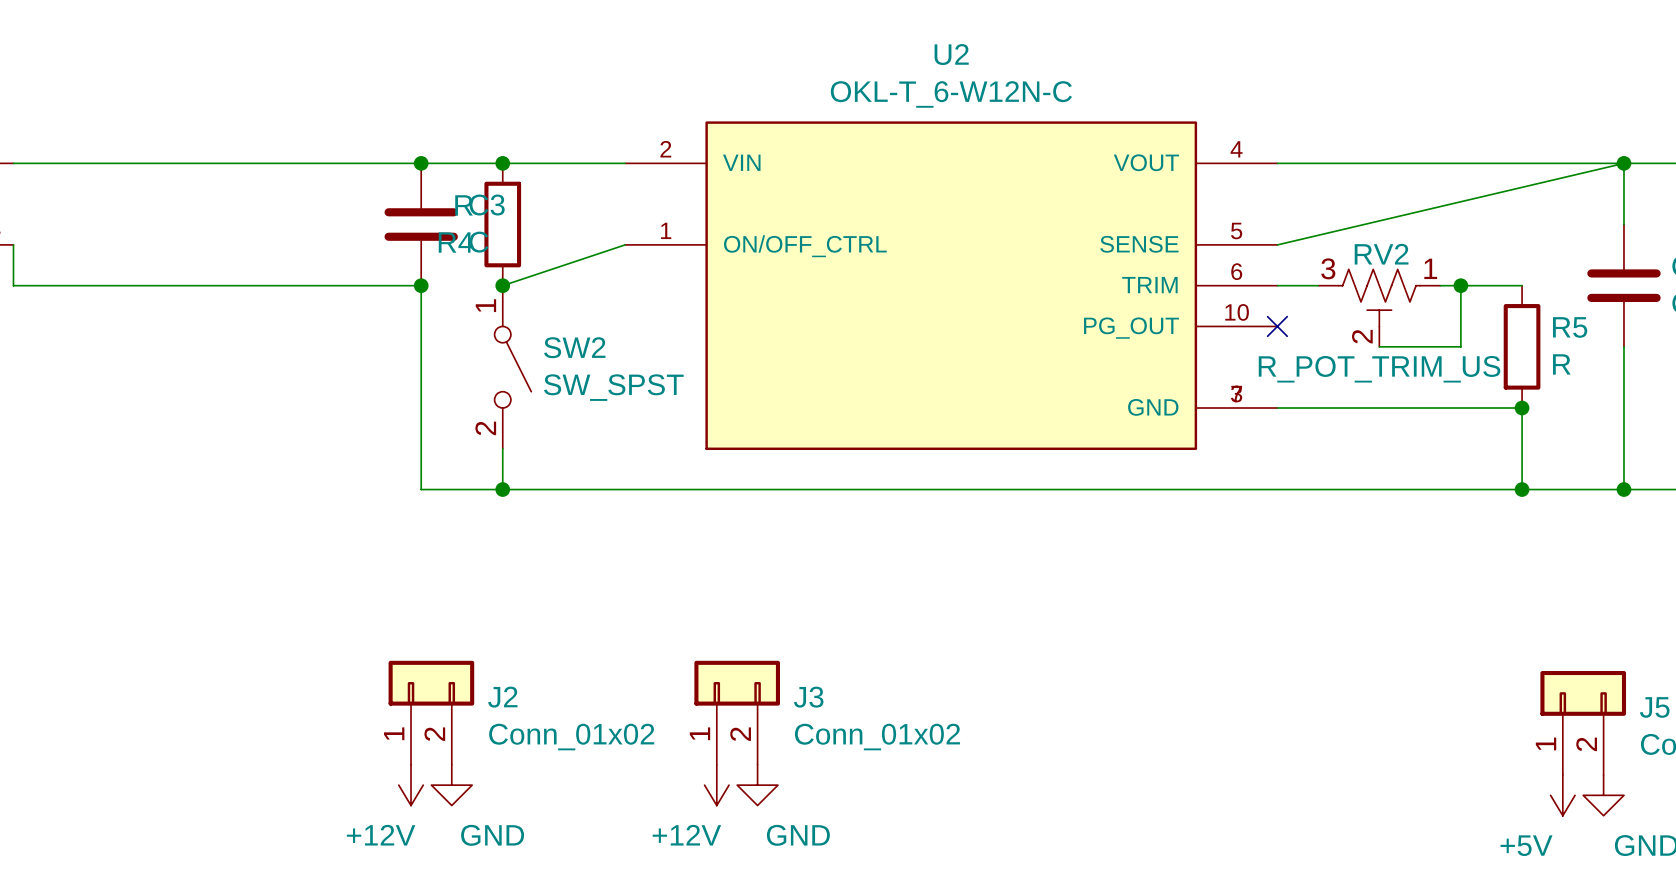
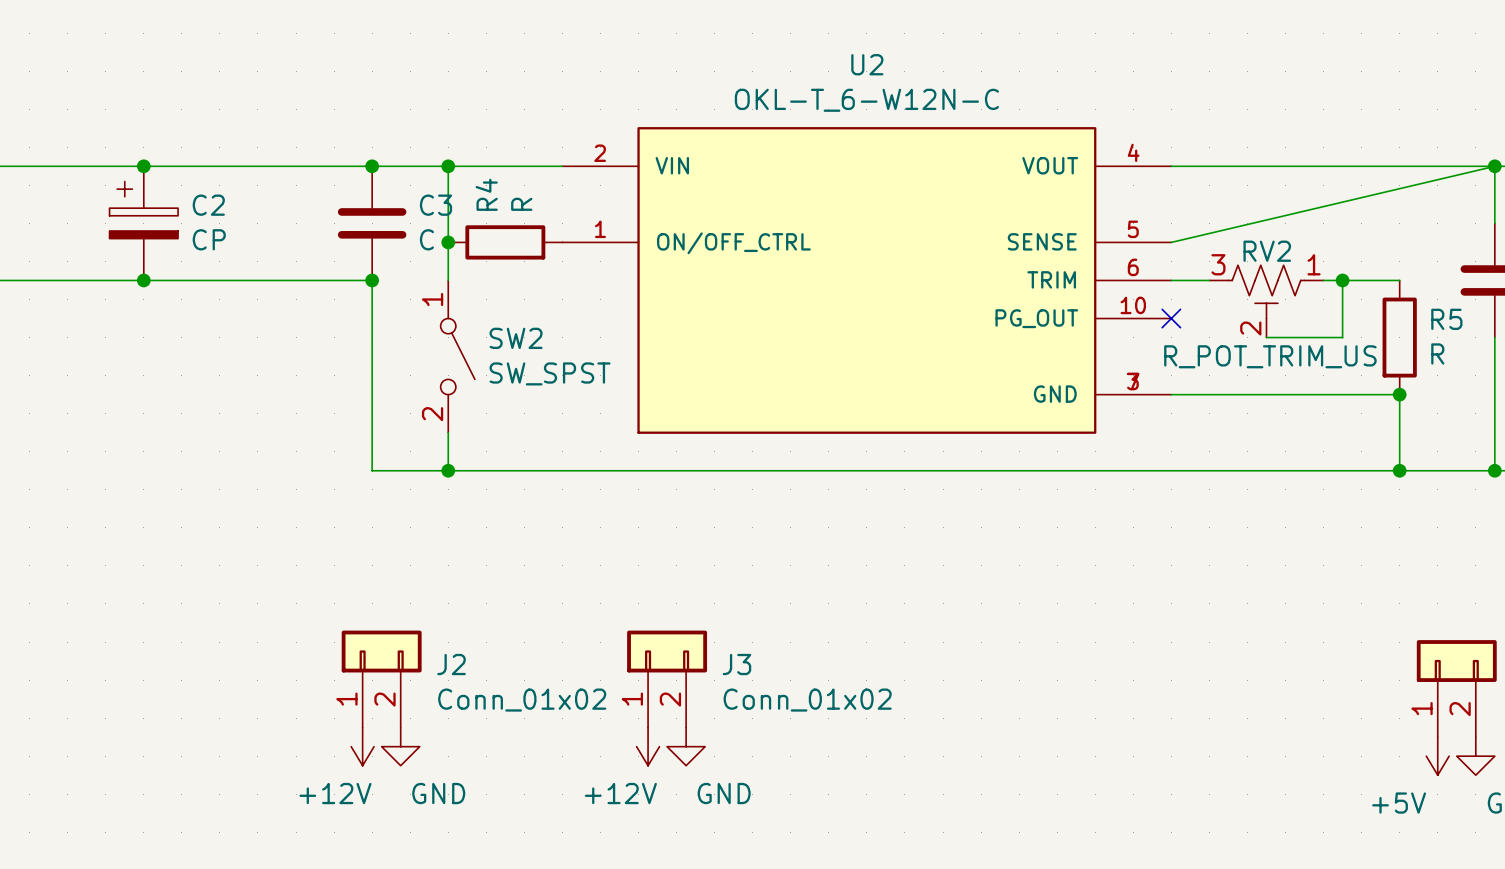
junction: none -> (143, 166)
C2: none -> CP (143, 223)
R4 rotation: 0° (502, 224) -> 90° clockwise (505, 242)
wire: (625, 244) (502, 285) -> (448, 166) (448, 280)
junction: none -> (143, 280)
junction position: (502, 285) -> (448, 242)

